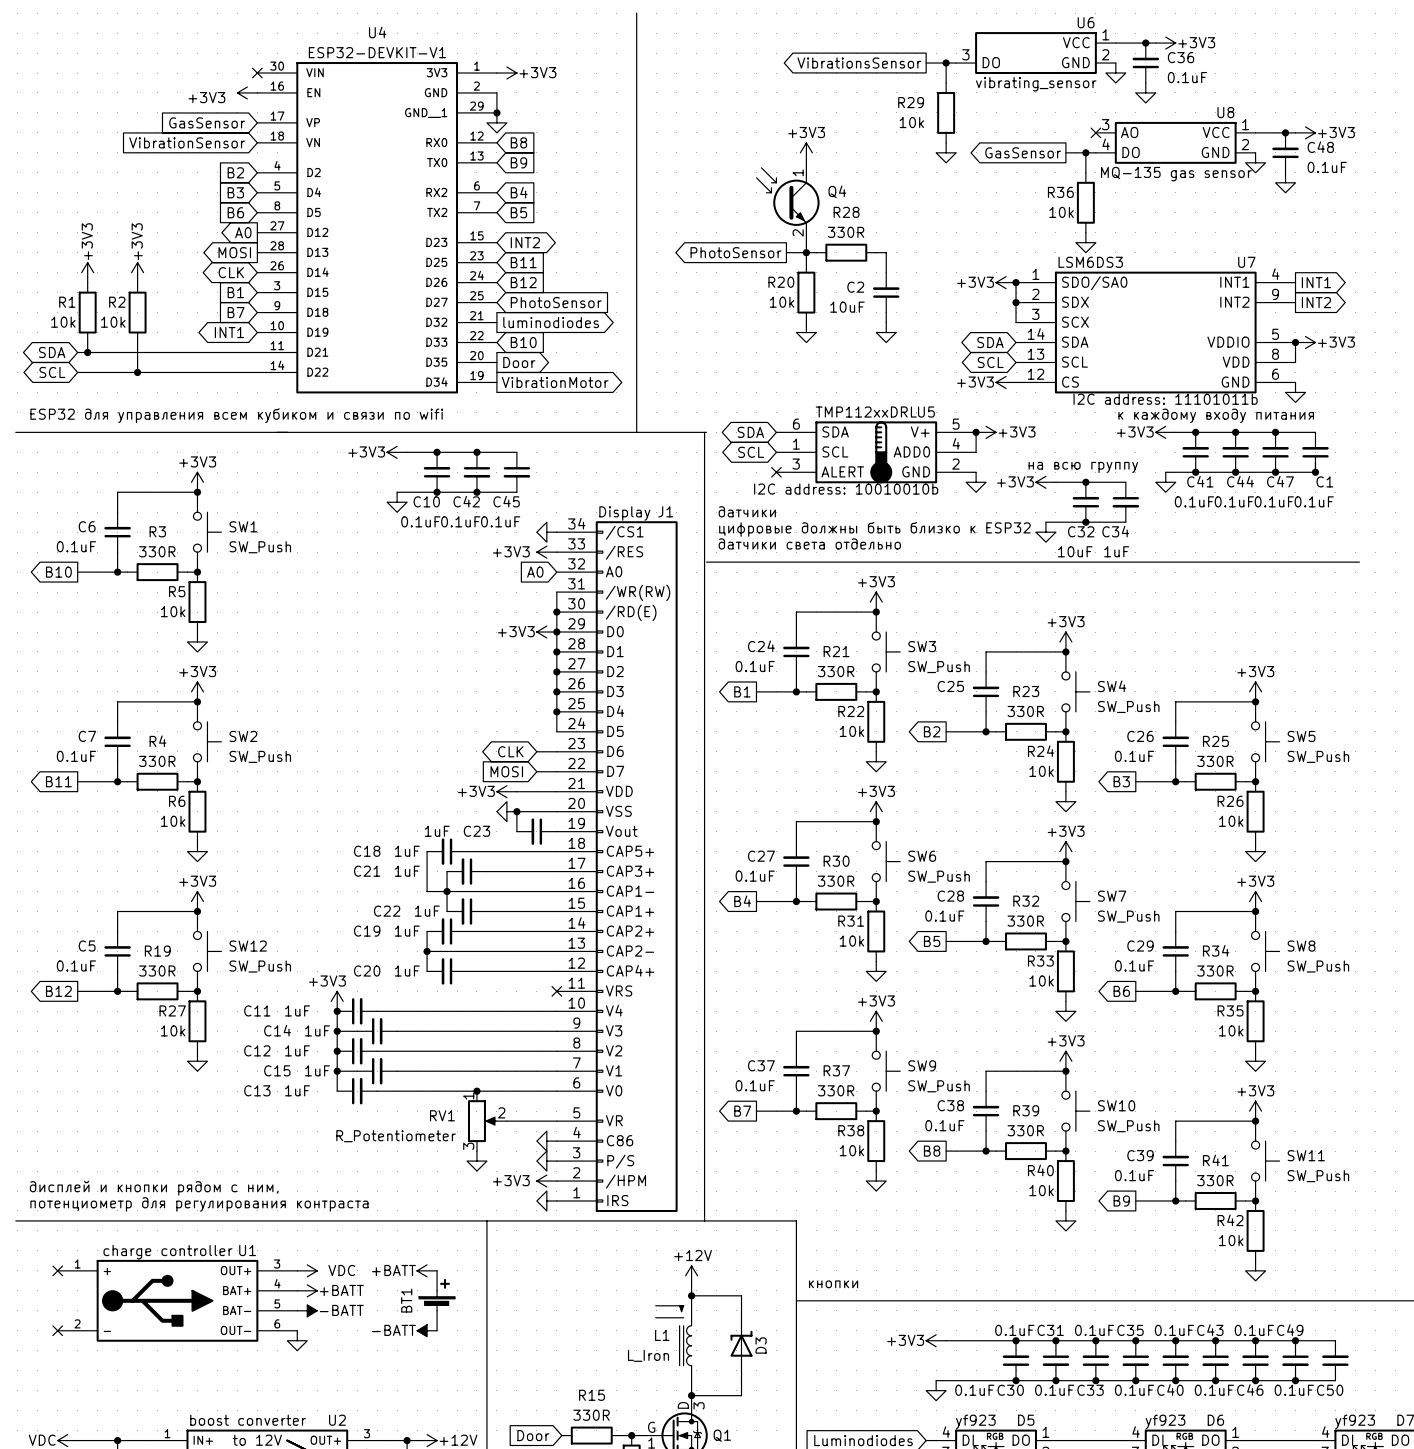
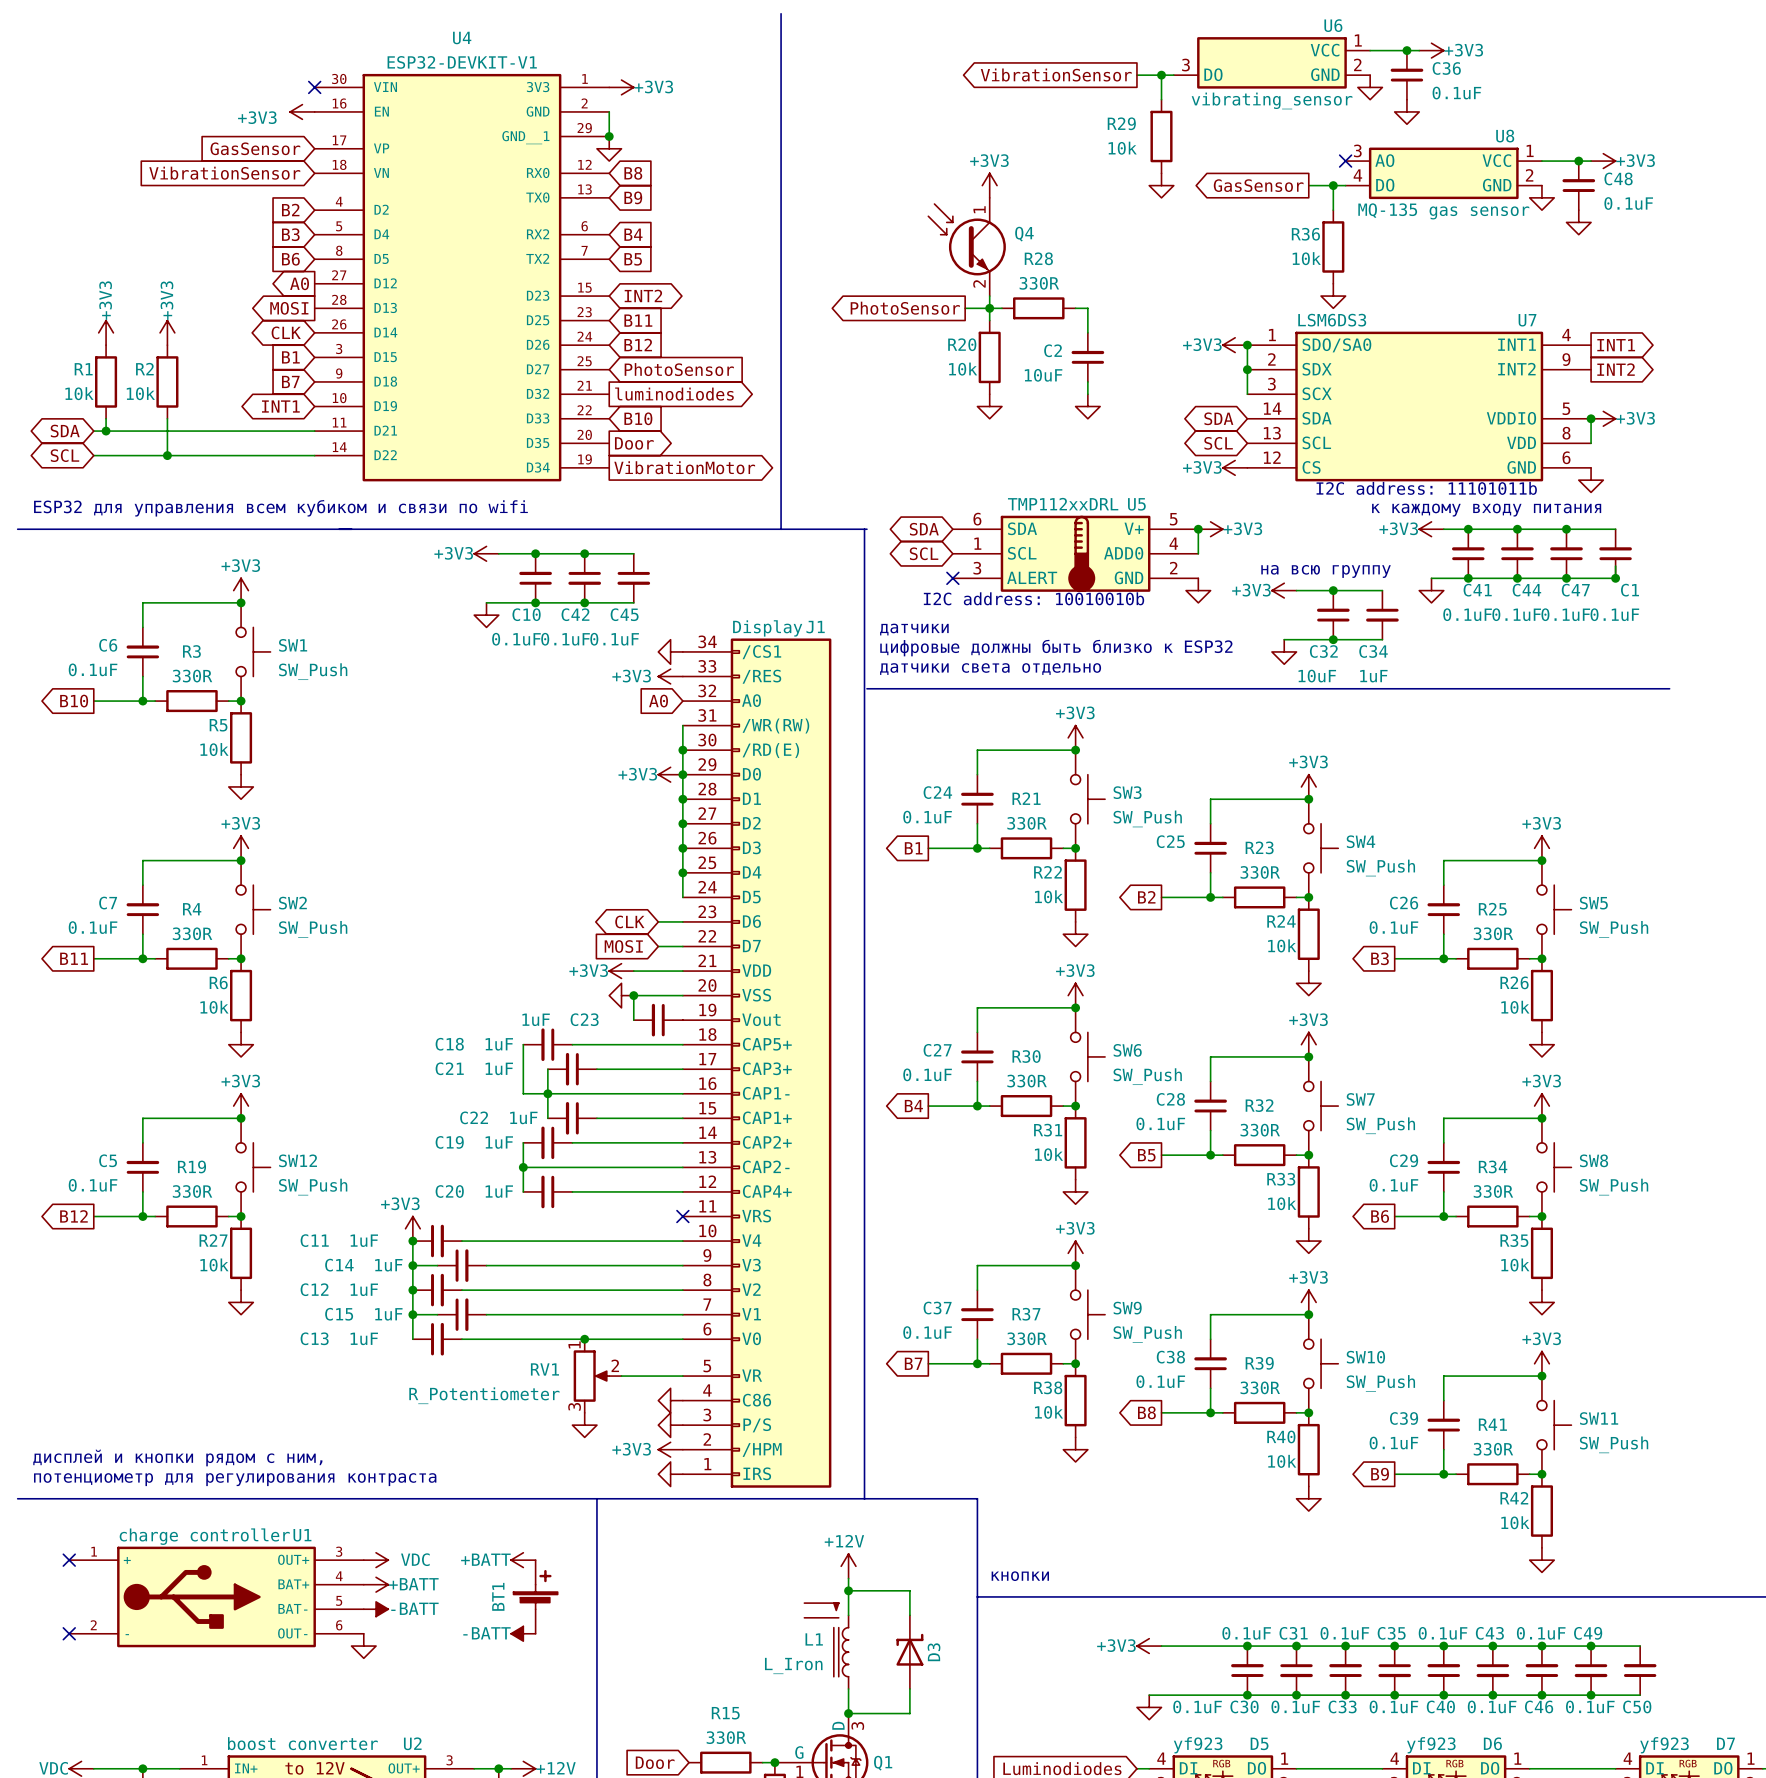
global label: VibrationsSensor (859, 63) -> VibrationSensor (1056, 75)

